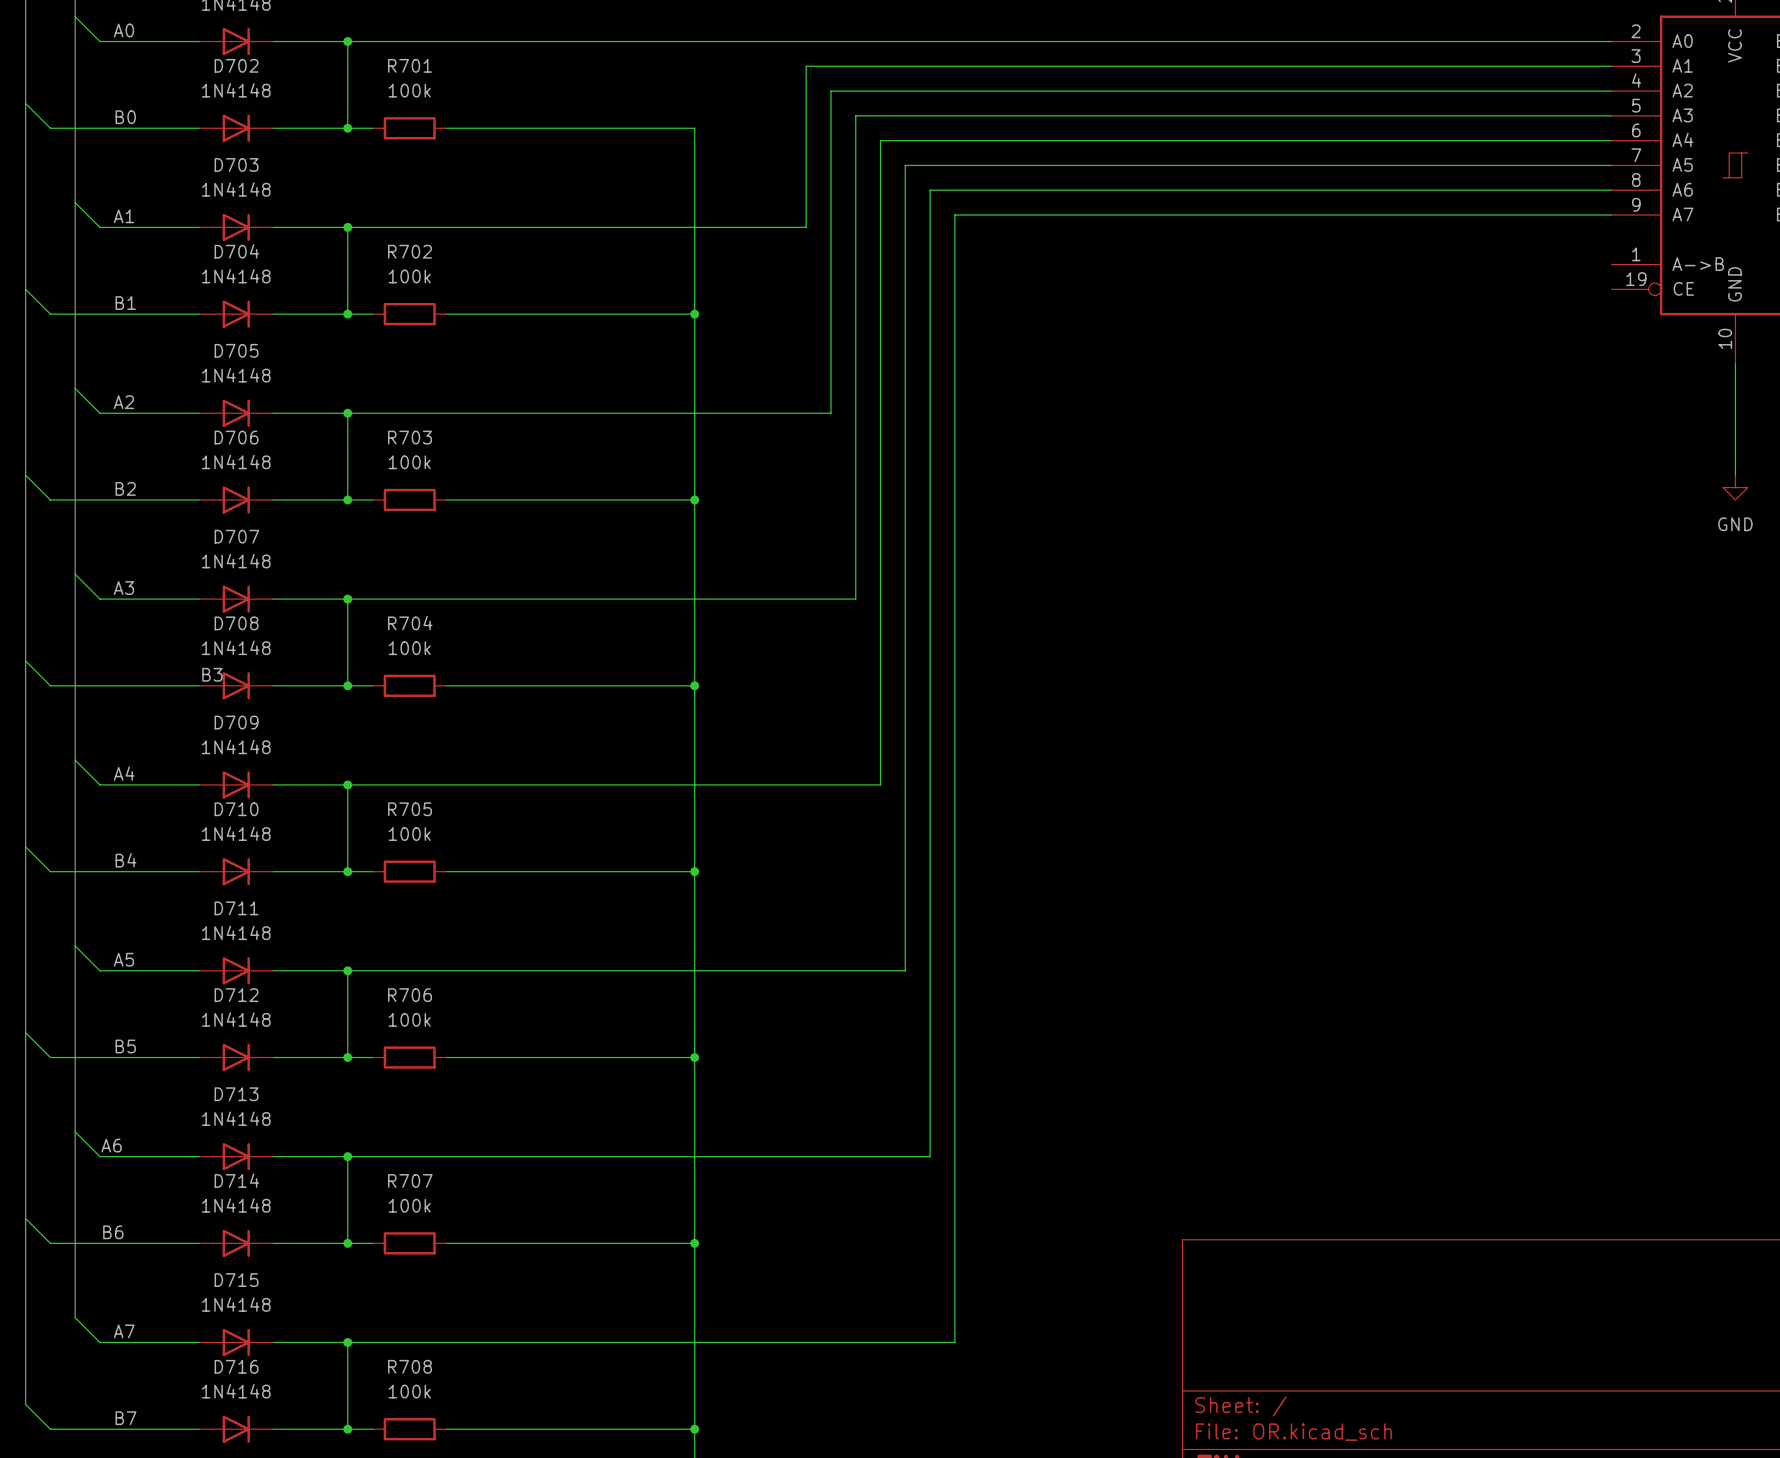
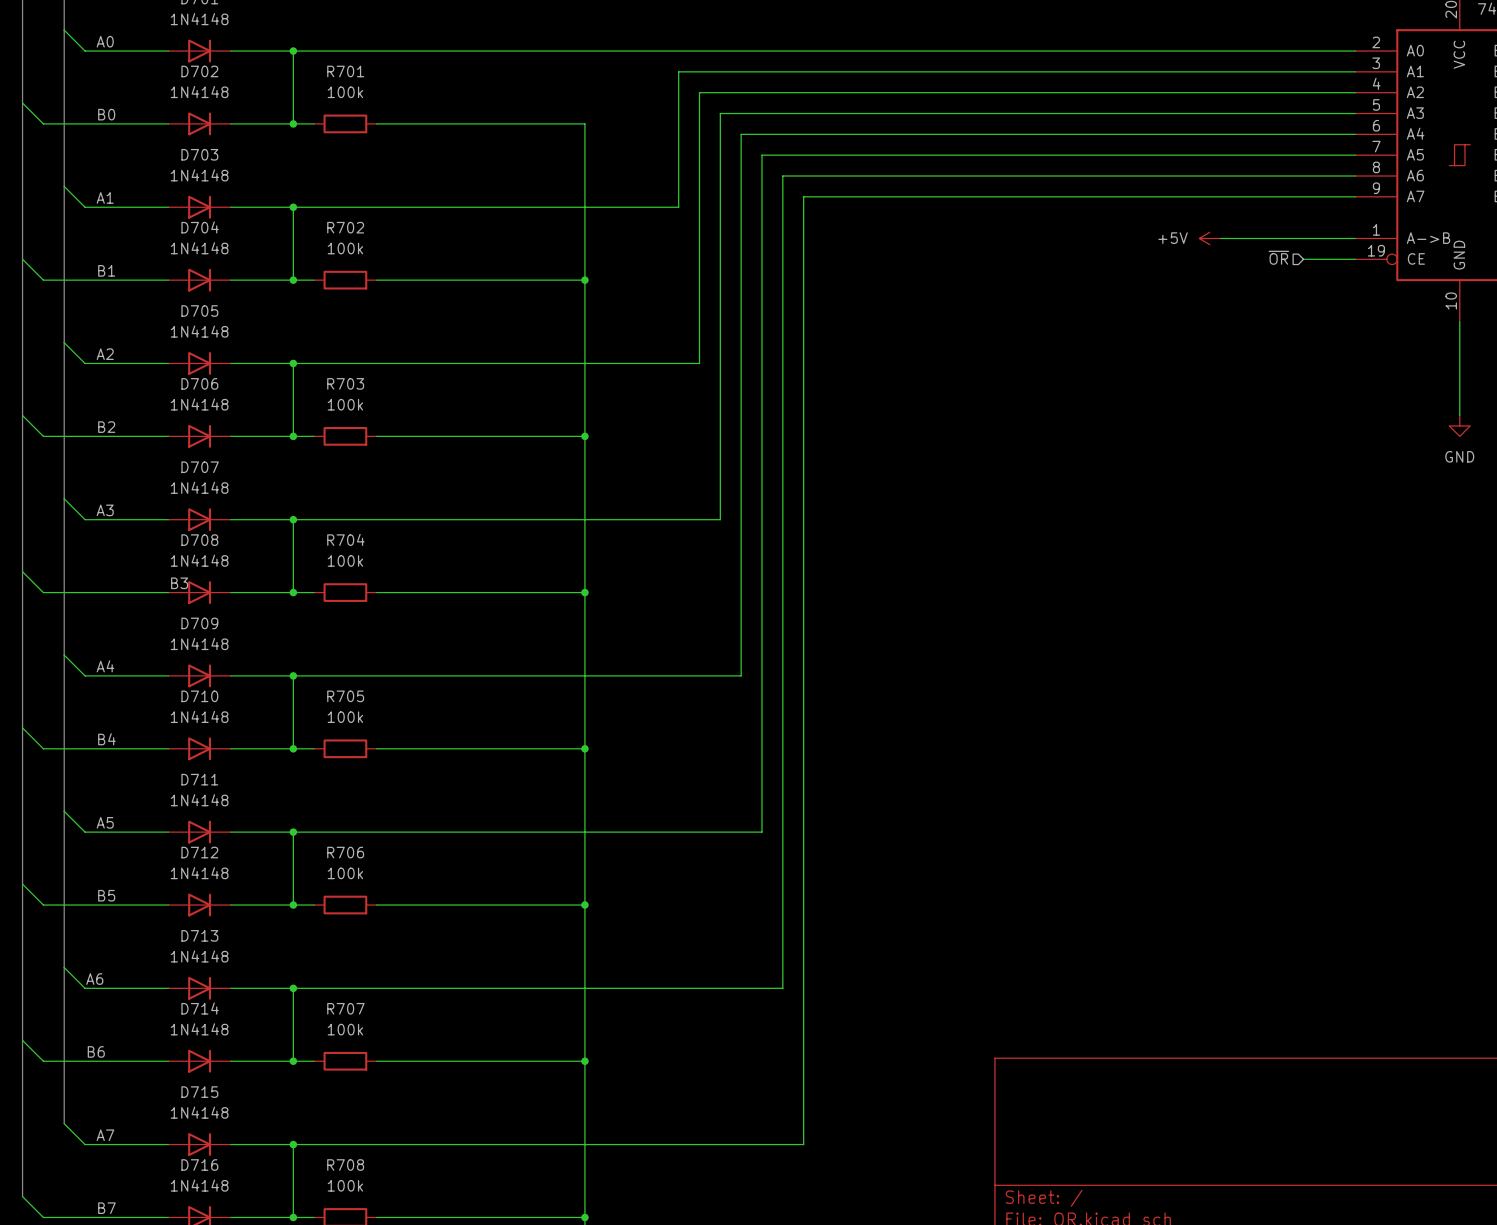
power symbol: none -> +5V (1209, 238)
wire: none -> (1220, 238) (1355, 238)
hierarchical label: none -> ~{OR} (1278, 257)
wire: none -> (1303, 259) (1355, 259)

